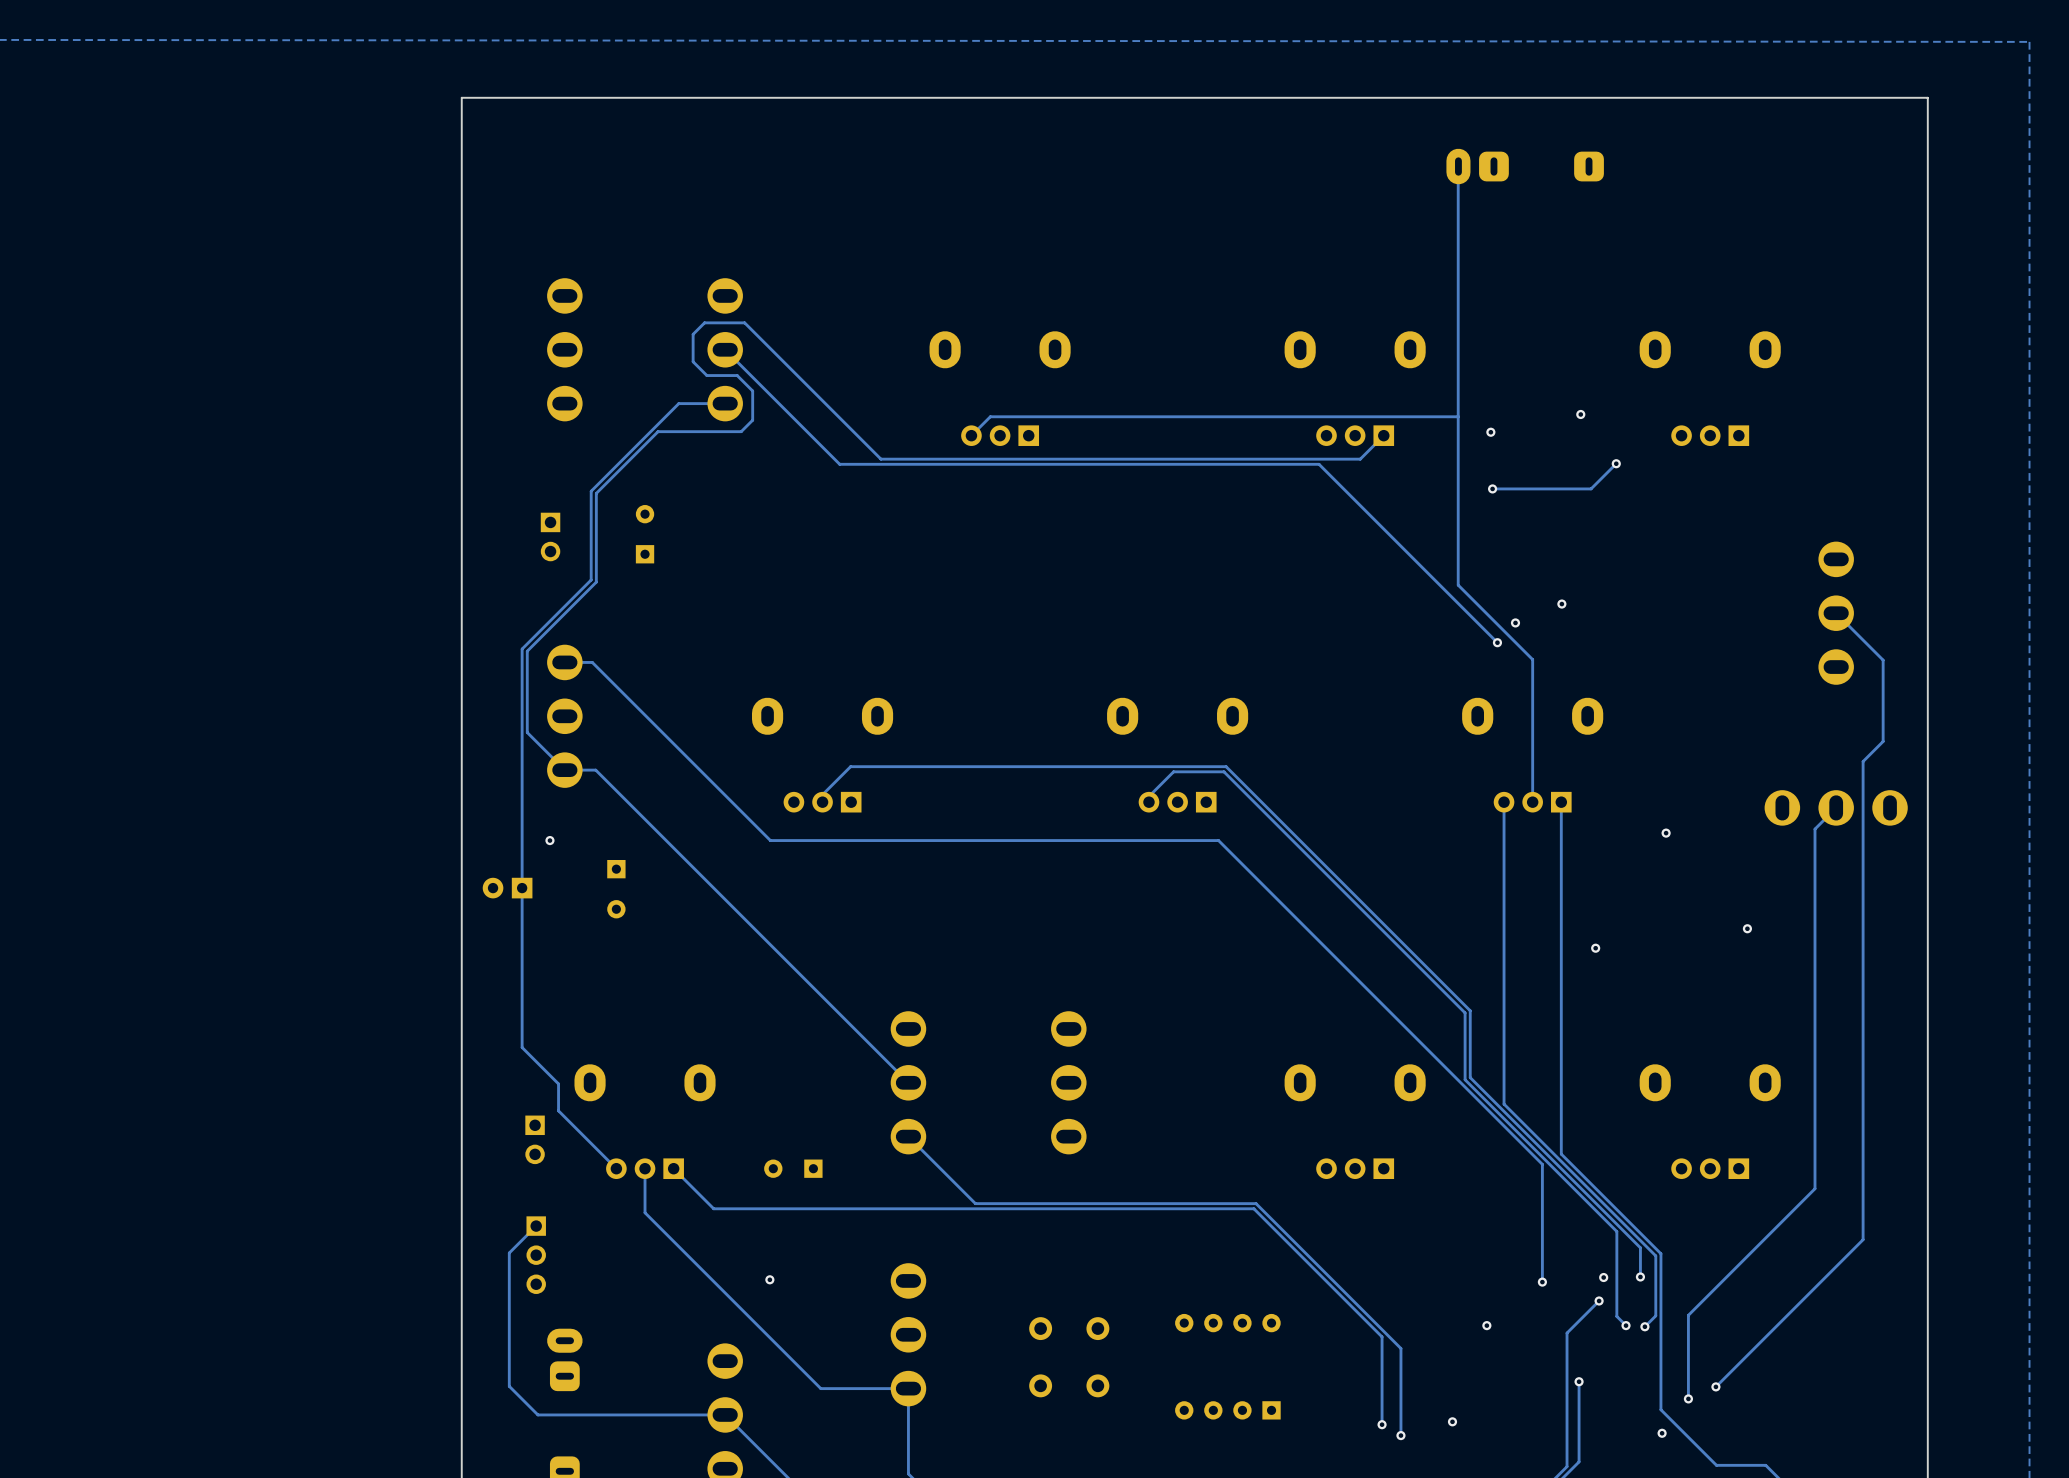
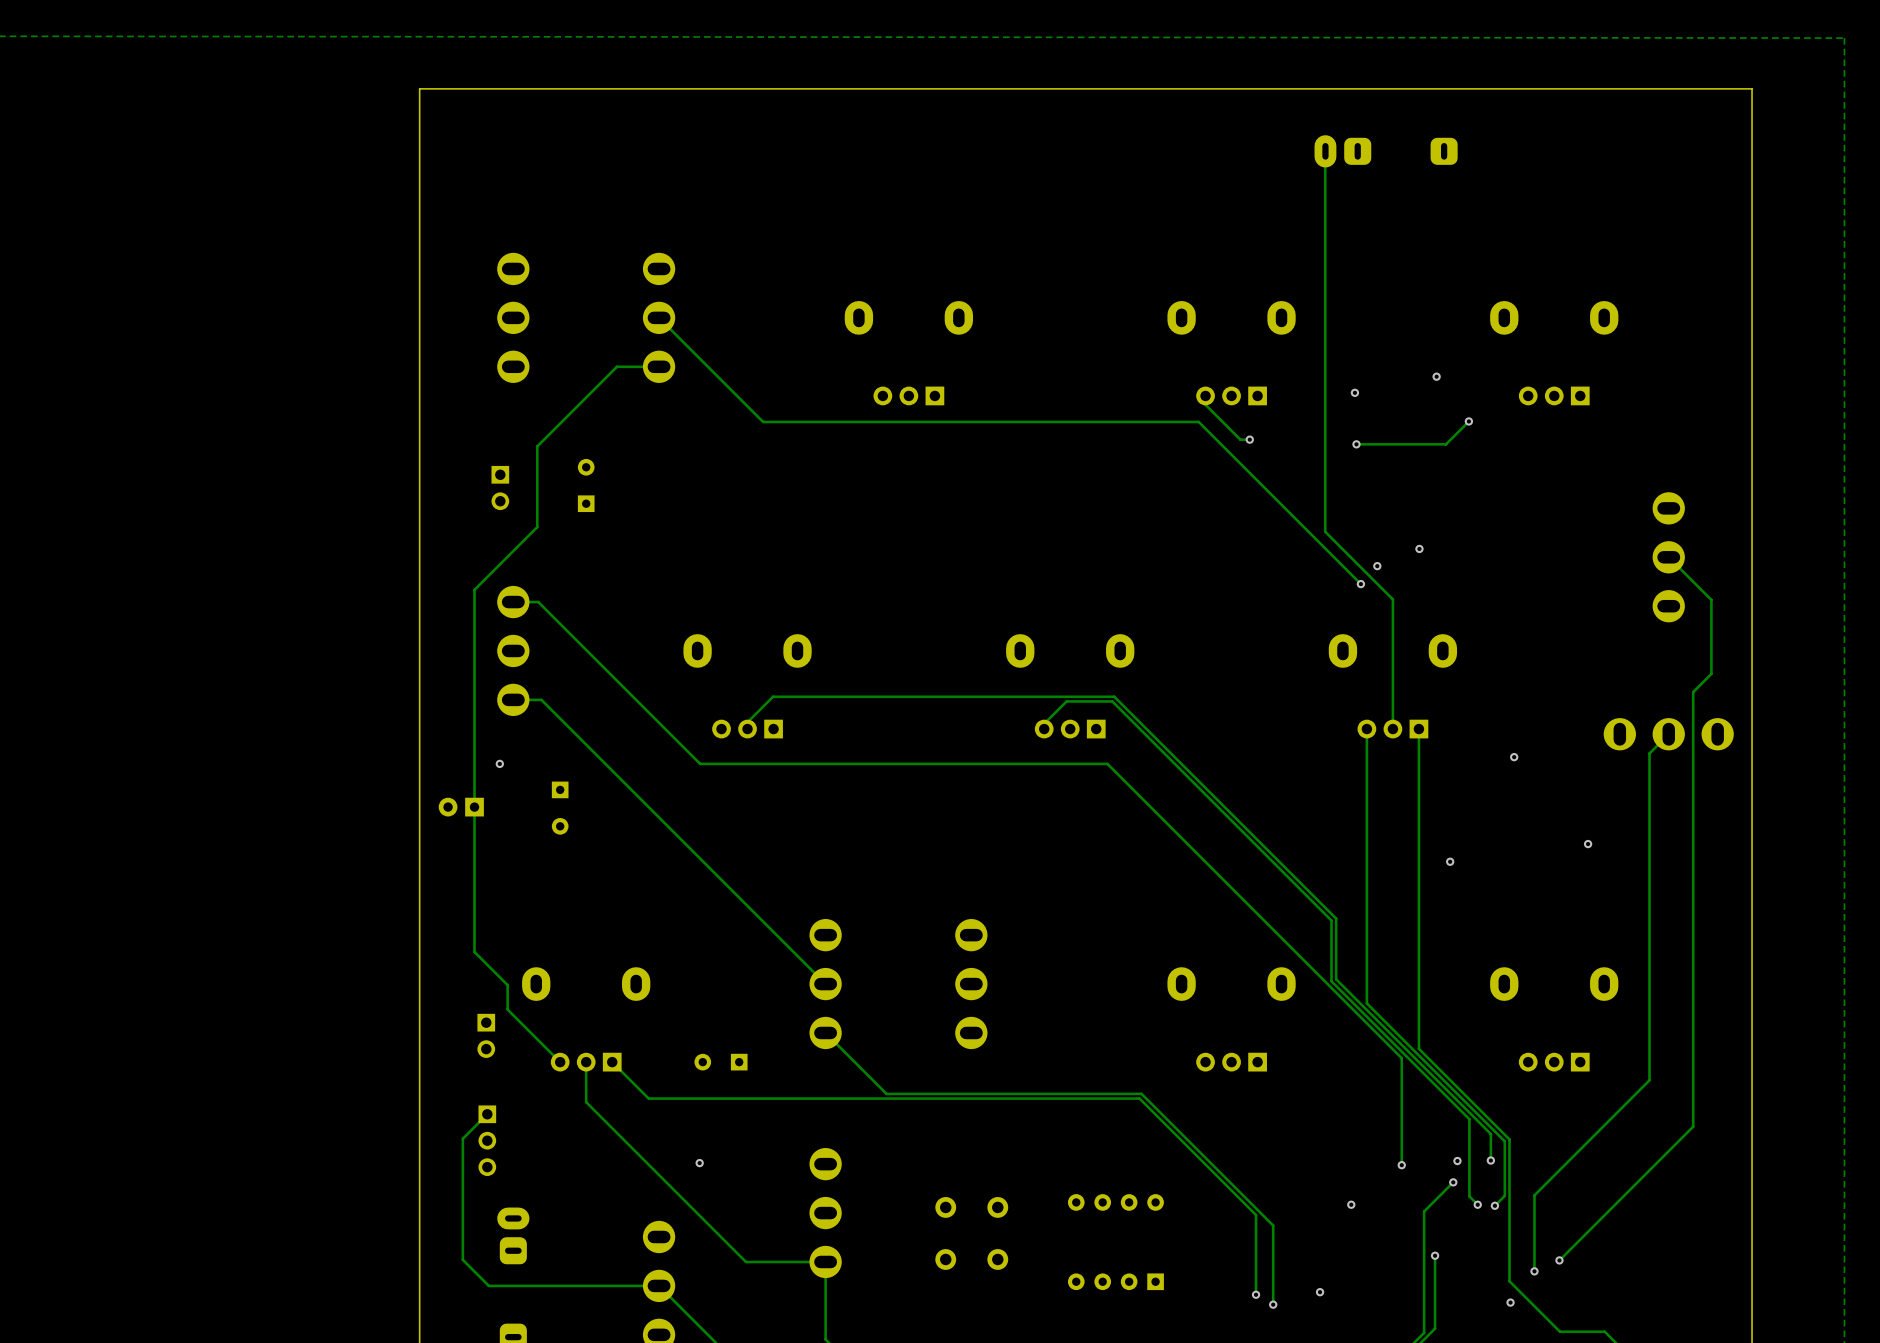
track: (1458, 416) (990, 416) (971, 435) -> none
track: none -> (1205, 395) (1205, 404) (1240, 439) (1249, 439)
track: (1383, 435) (1360, 459) (880, 459) (744, 322) (704, 322) (693, 334) (693, 361) (706, 375) (737, 375) (752, 391) (752, 420) (741, 431) (658, 431) (596, 493) (596, 582) (527, 651) (527, 732) (564, 770) -> none
via: none -> (1249, 439)

